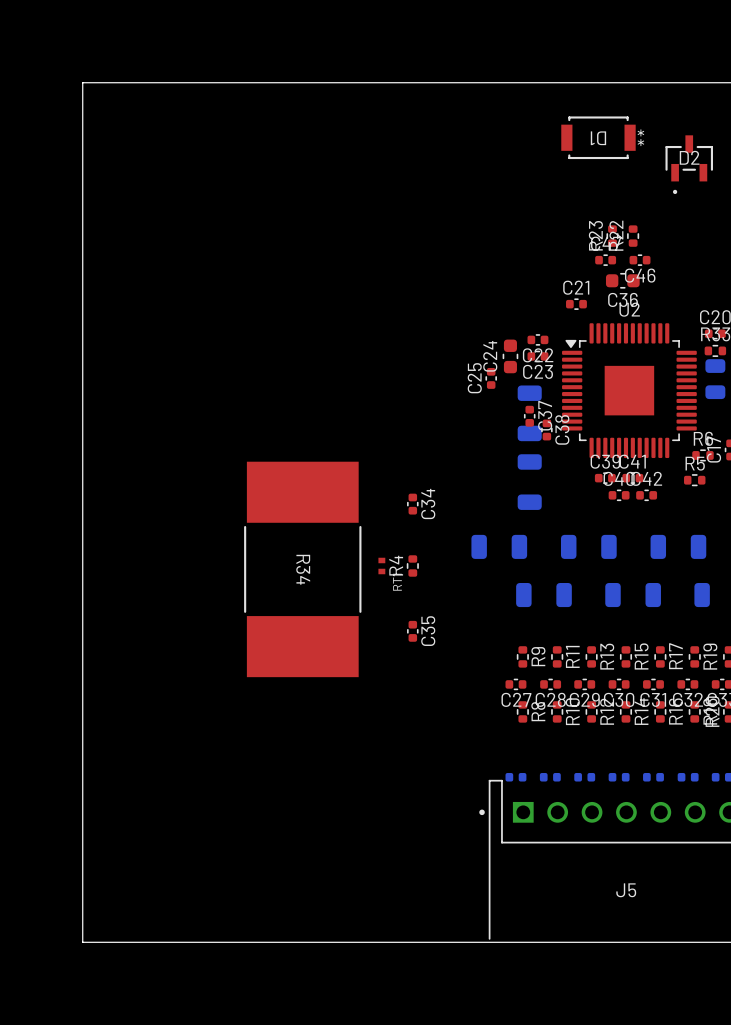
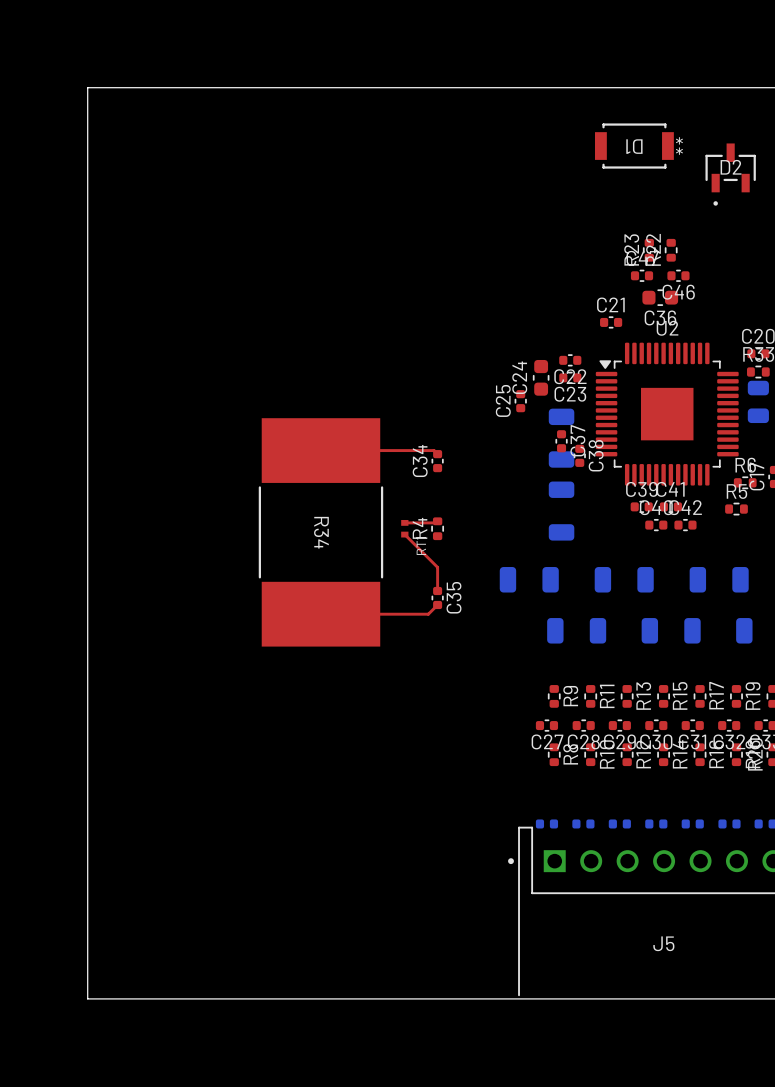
top track: none -> (320, 450) (434, 450) (437, 454)
top track: none -> (437, 521) (436, 522) (404, 522)
C34 name position: C34 (428, 503) -> C34 (420, 461)
top track: none -> (404, 534) (437, 567) (437, 590)
C34 position: (412, 504) -> (437, 461)
RT1 position: (381, 565) -> (404, 528)
R4 position: (412, 565) -> (437, 528)
R34 position: (302, 569) -> (320, 532)
top track: none -> (437, 604) (428, 614) (320, 614)
C35 position: (412, 631) -> (437, 597)

